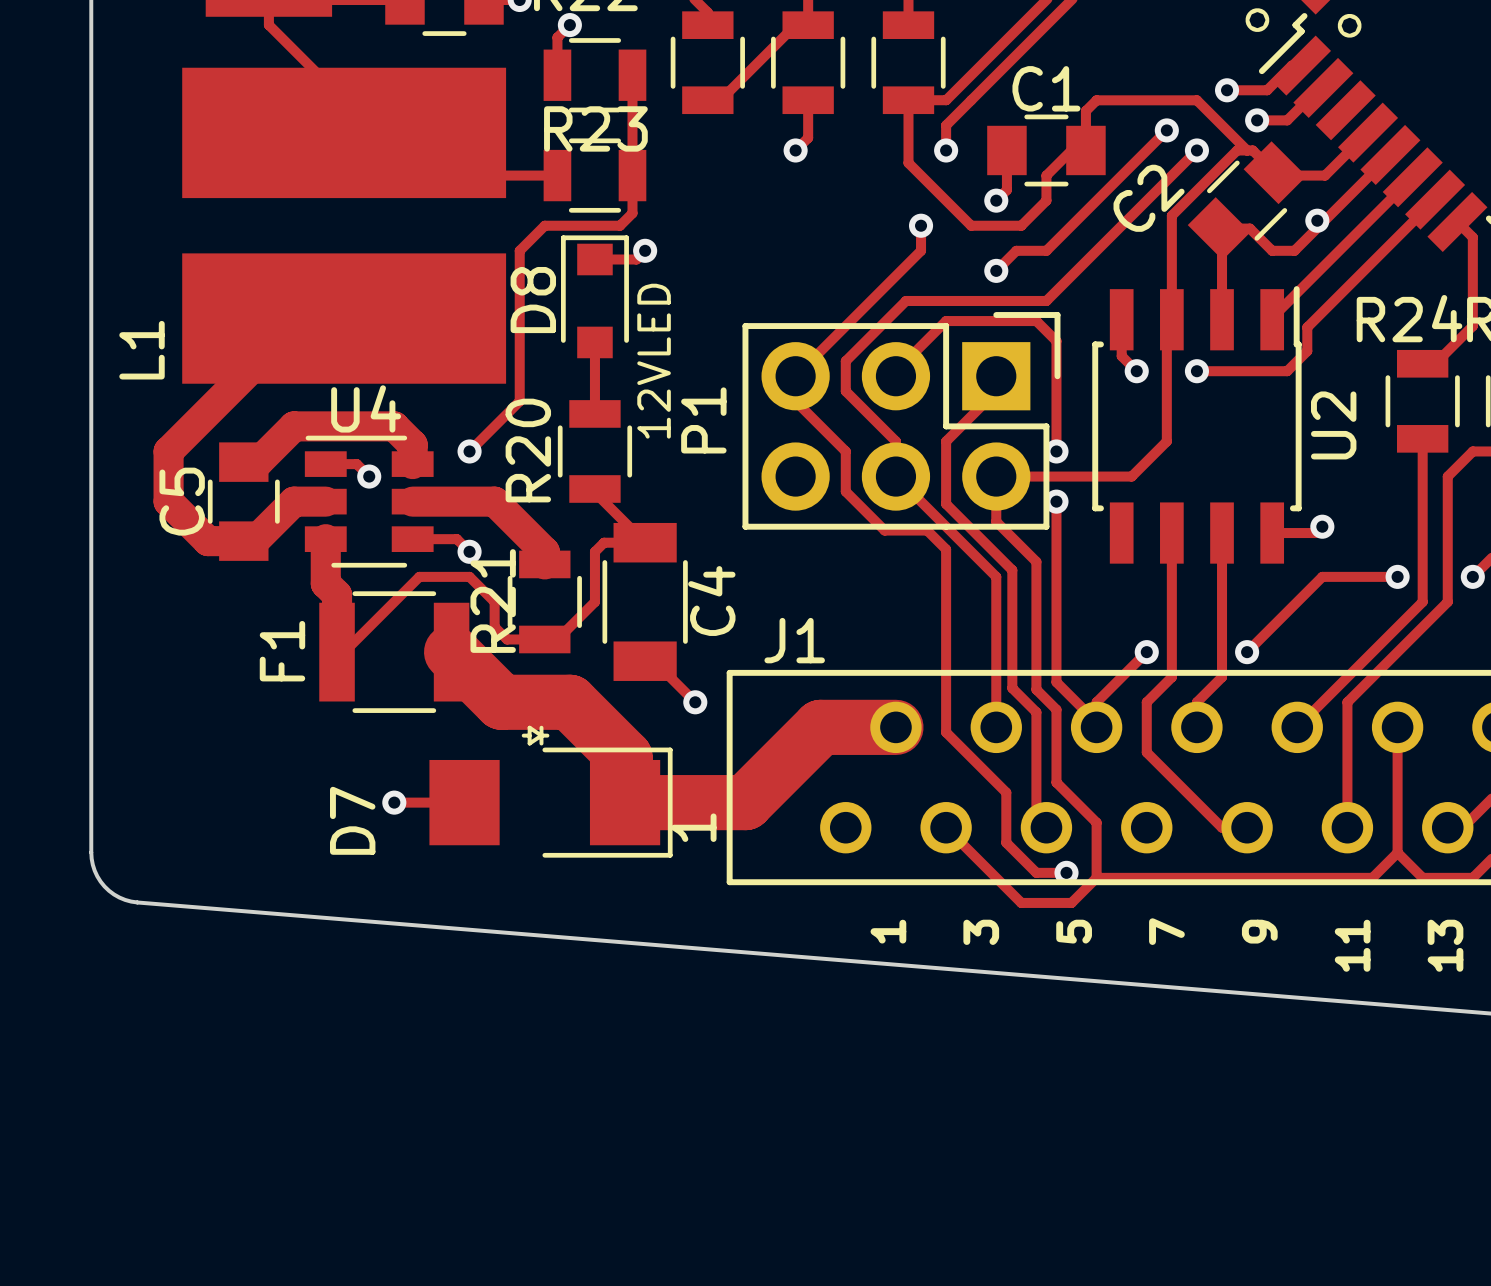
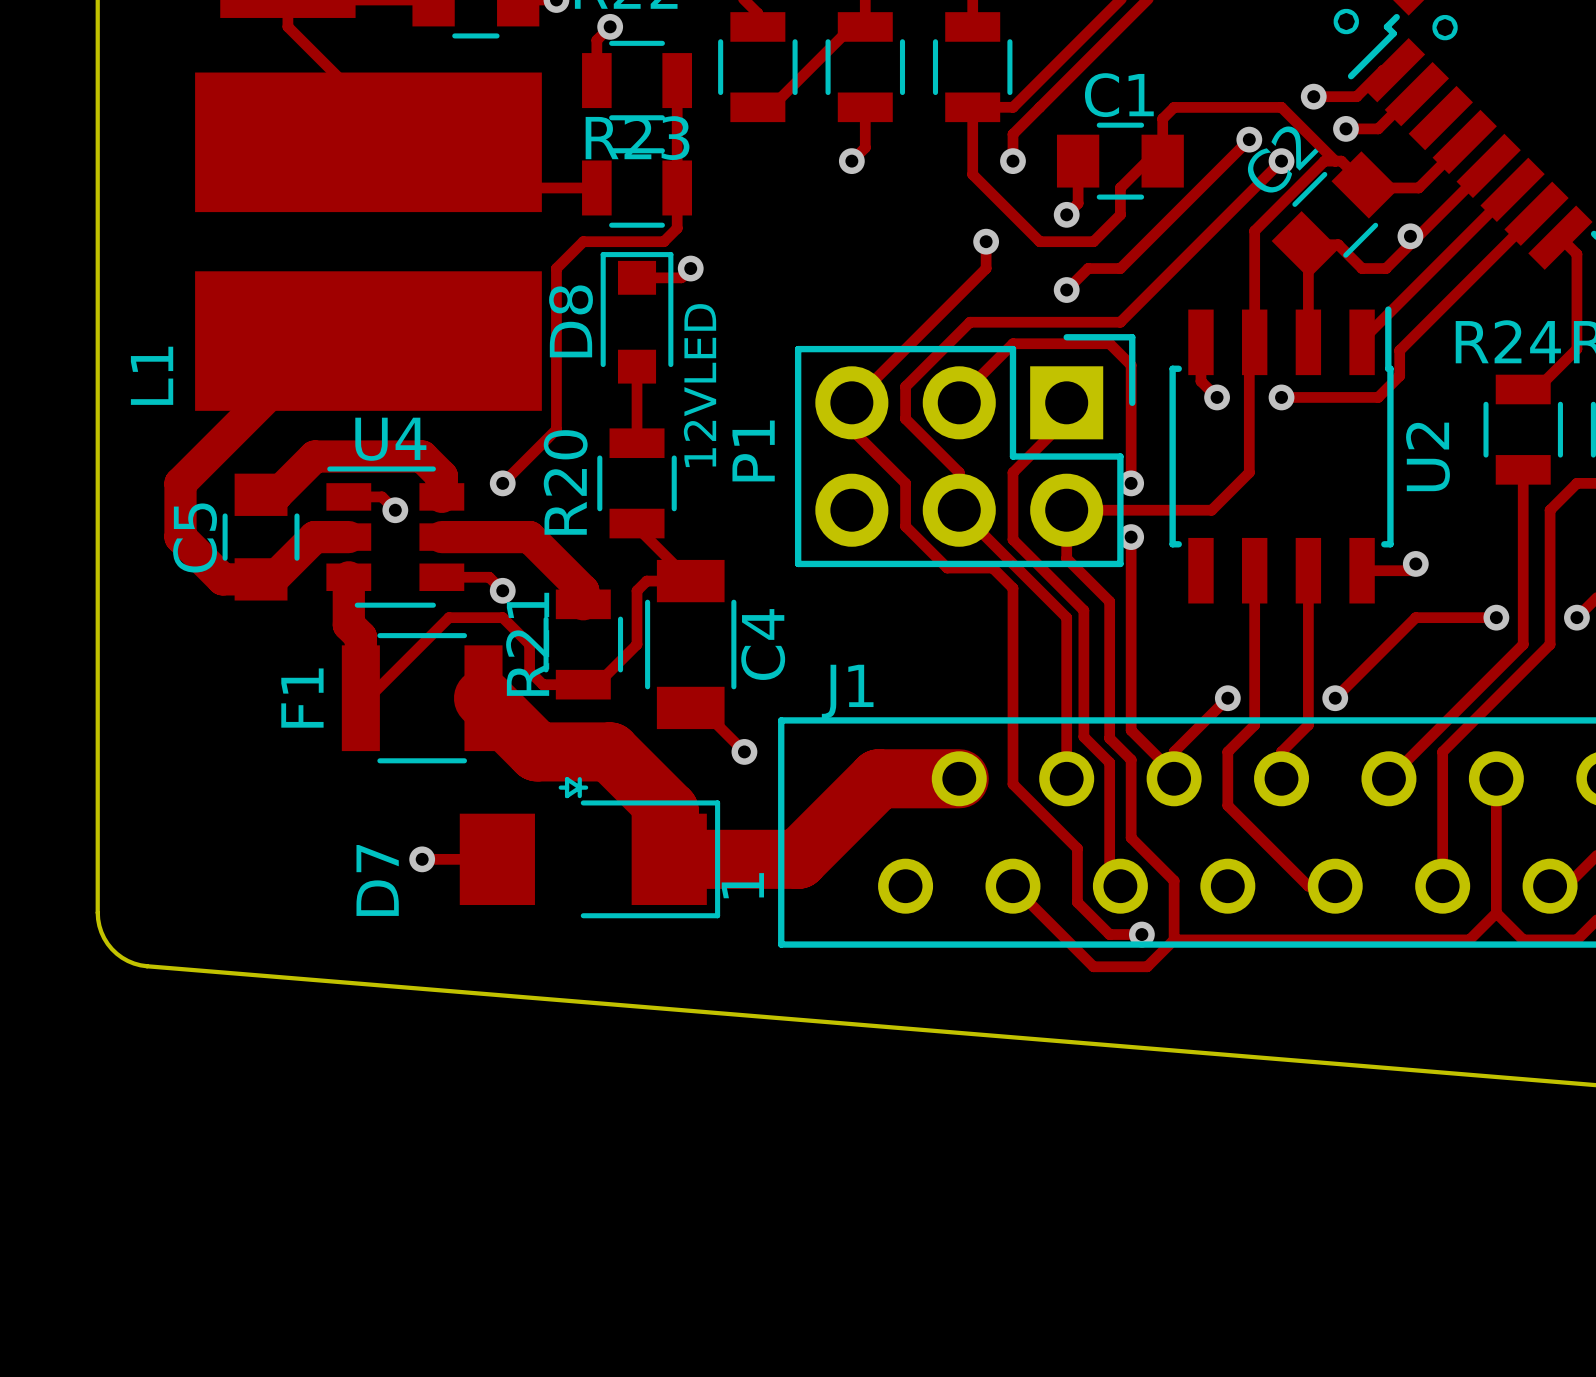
C2 name position: C2 (1149, 198) -> C2 (1283, 159)
text: 1 (888, 931) -> none
text: 5 (1074, 931) -> none
text: 7 (1166, 931) -> none
text: 9 (1259, 931) -> none
text: 3 (981, 932) -> none
text: 11 (1352, 945) -> none
text: 13 (1445, 945) -> none

